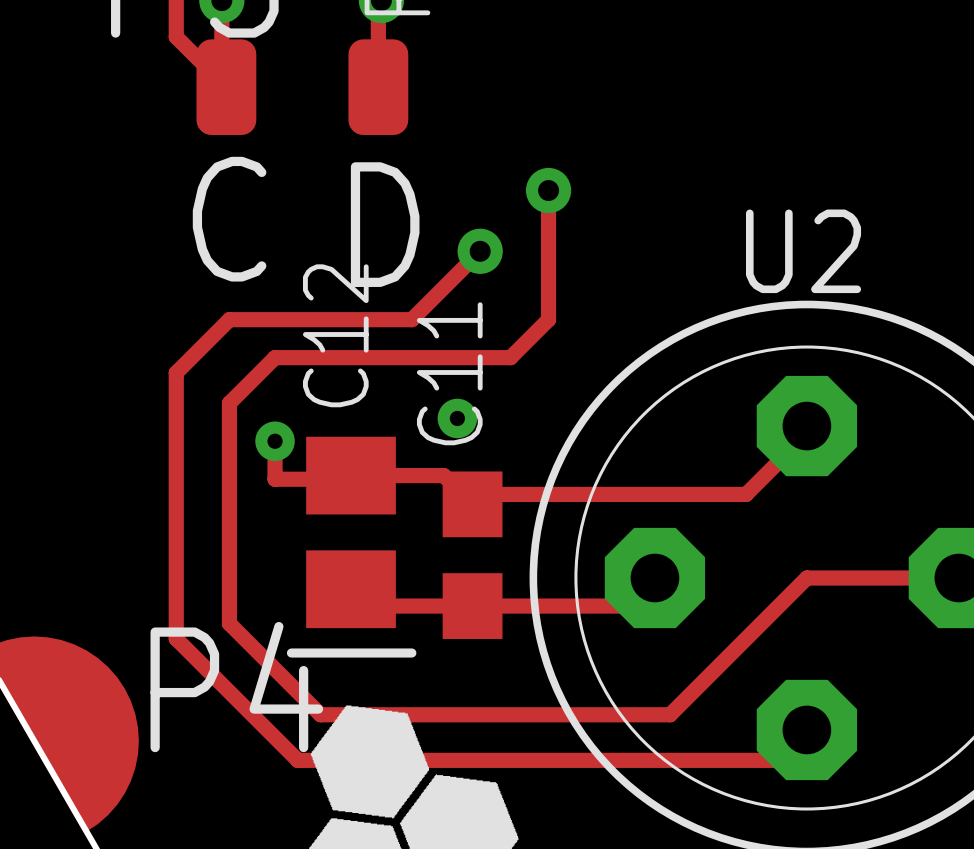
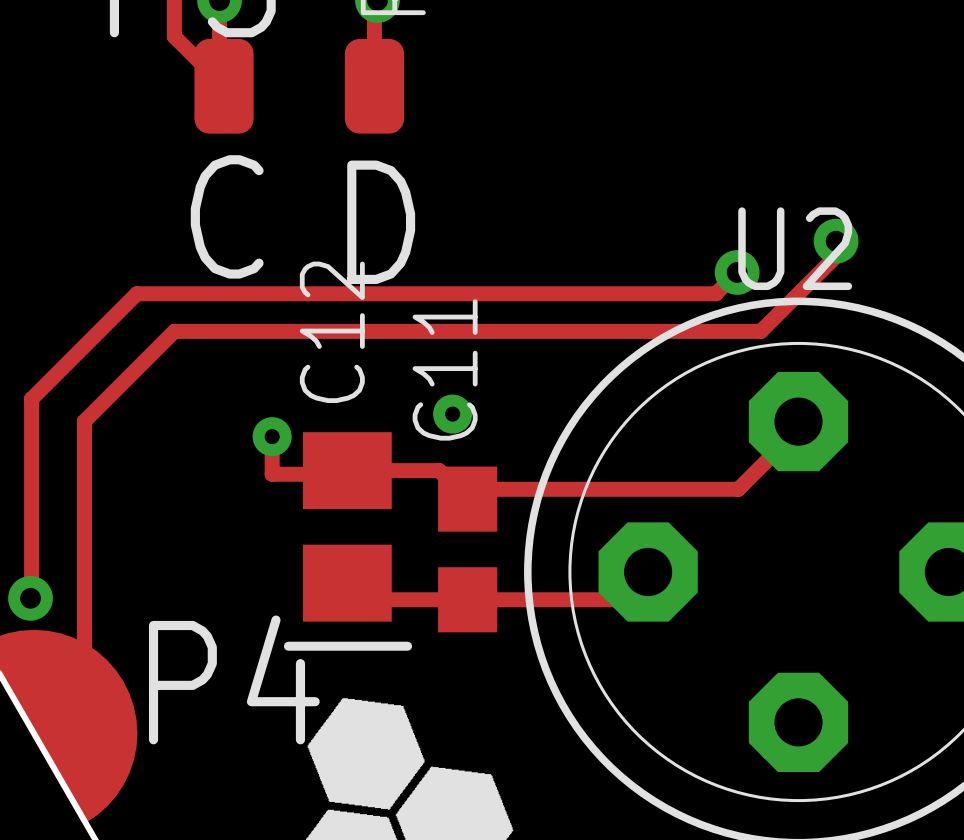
track: (548, 190) (548, 319) (510, 357) (275, 357) (229, 403) (229, 623) (320, 714) (670, 714) (806, 578) (958, 578) -> none
via: (548, 190) -> none
track: none -> (836, 241) (836, 256) (760, 331) (174, 331) (84, 421) (84, 697) (69, 712)
via: none -> (836, 241)
track: (480, 251) (411, 319) (229, 319) (176, 372) (176, 638) (297, 760) (776, 760) -> none
via: (480, 251) -> none
track: none -> (737, 272) (715, 293) (136, 293) (31, 399) (31, 602) (30, 598)
via: none -> (737, 272)
via: none -> (30, 598)

